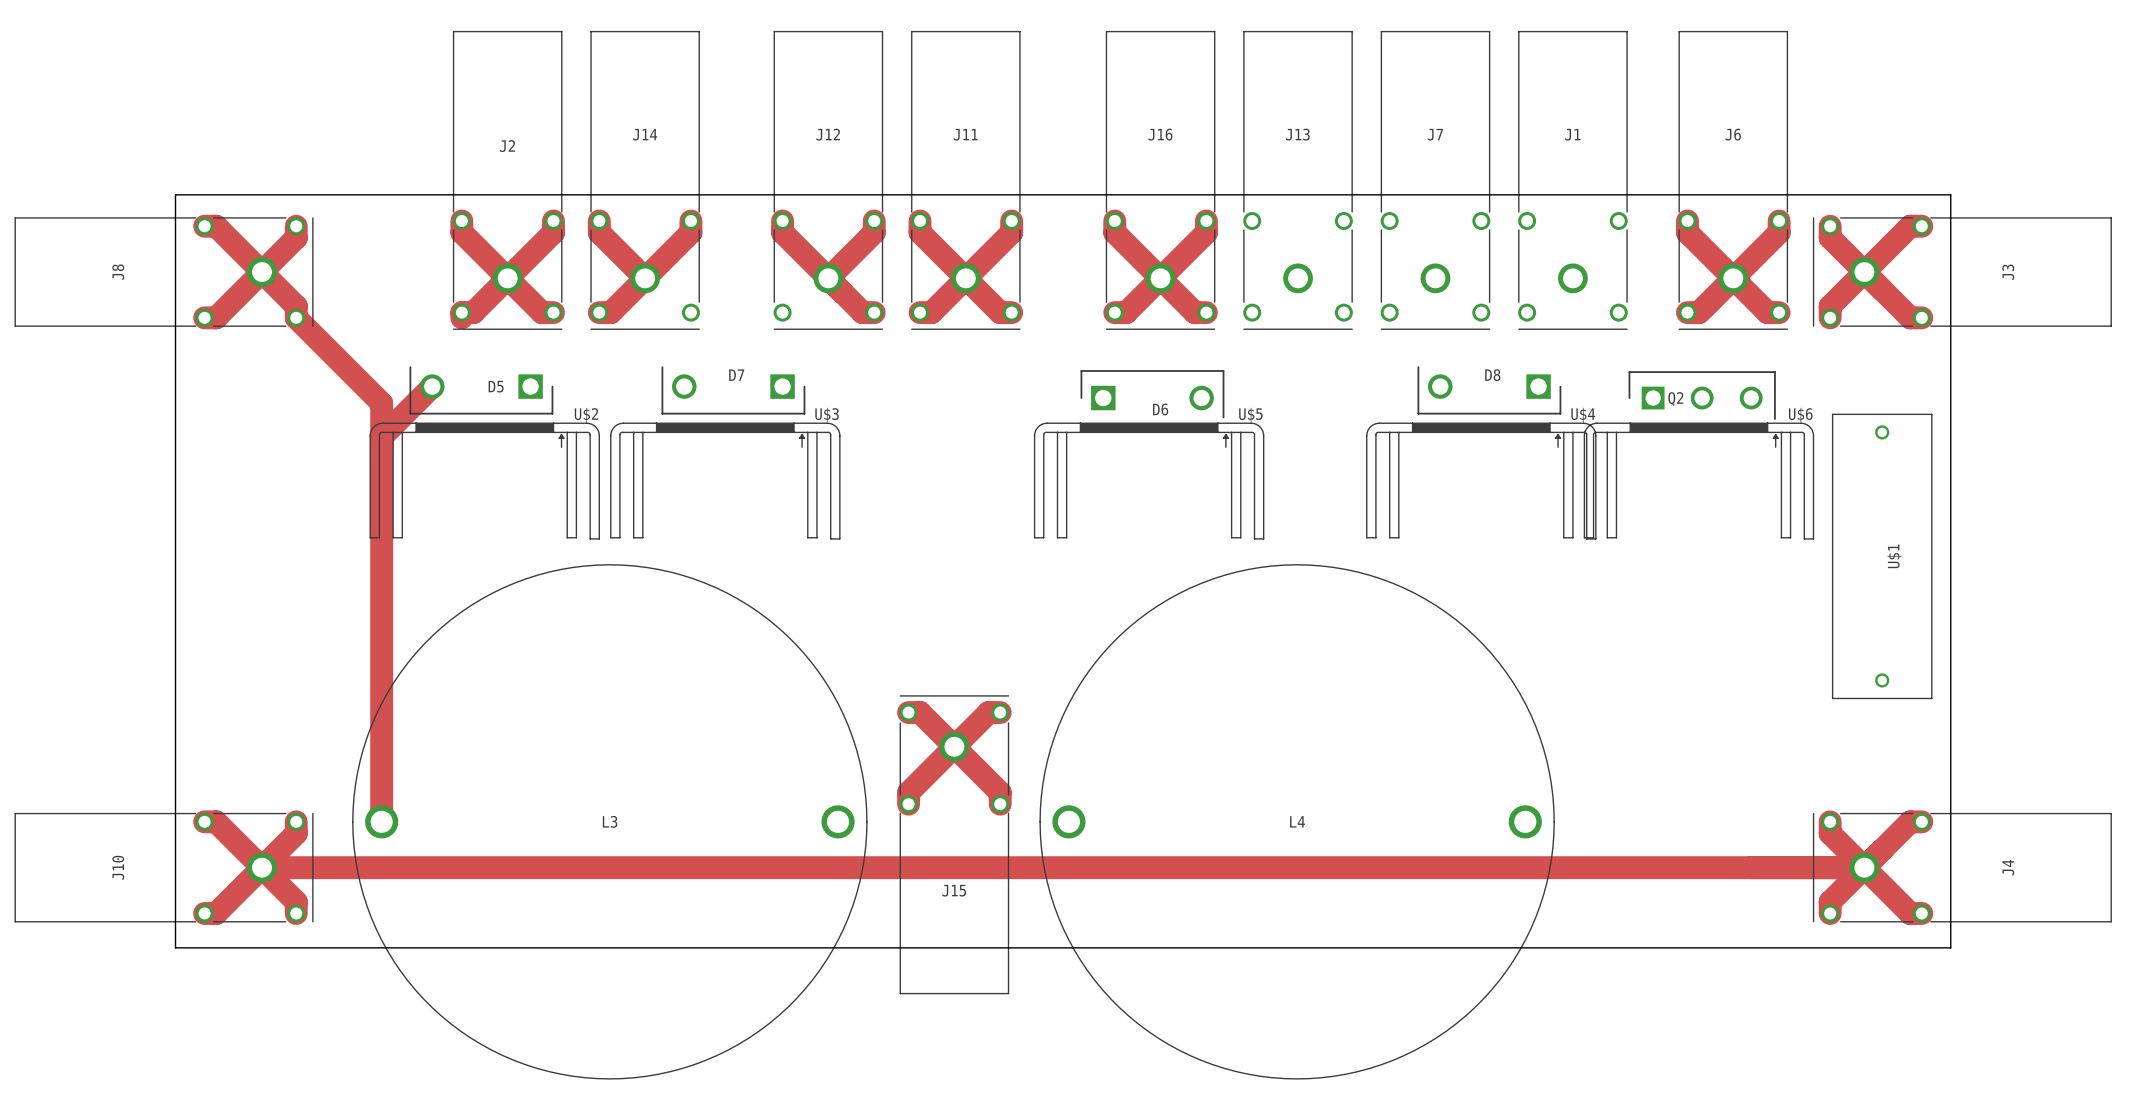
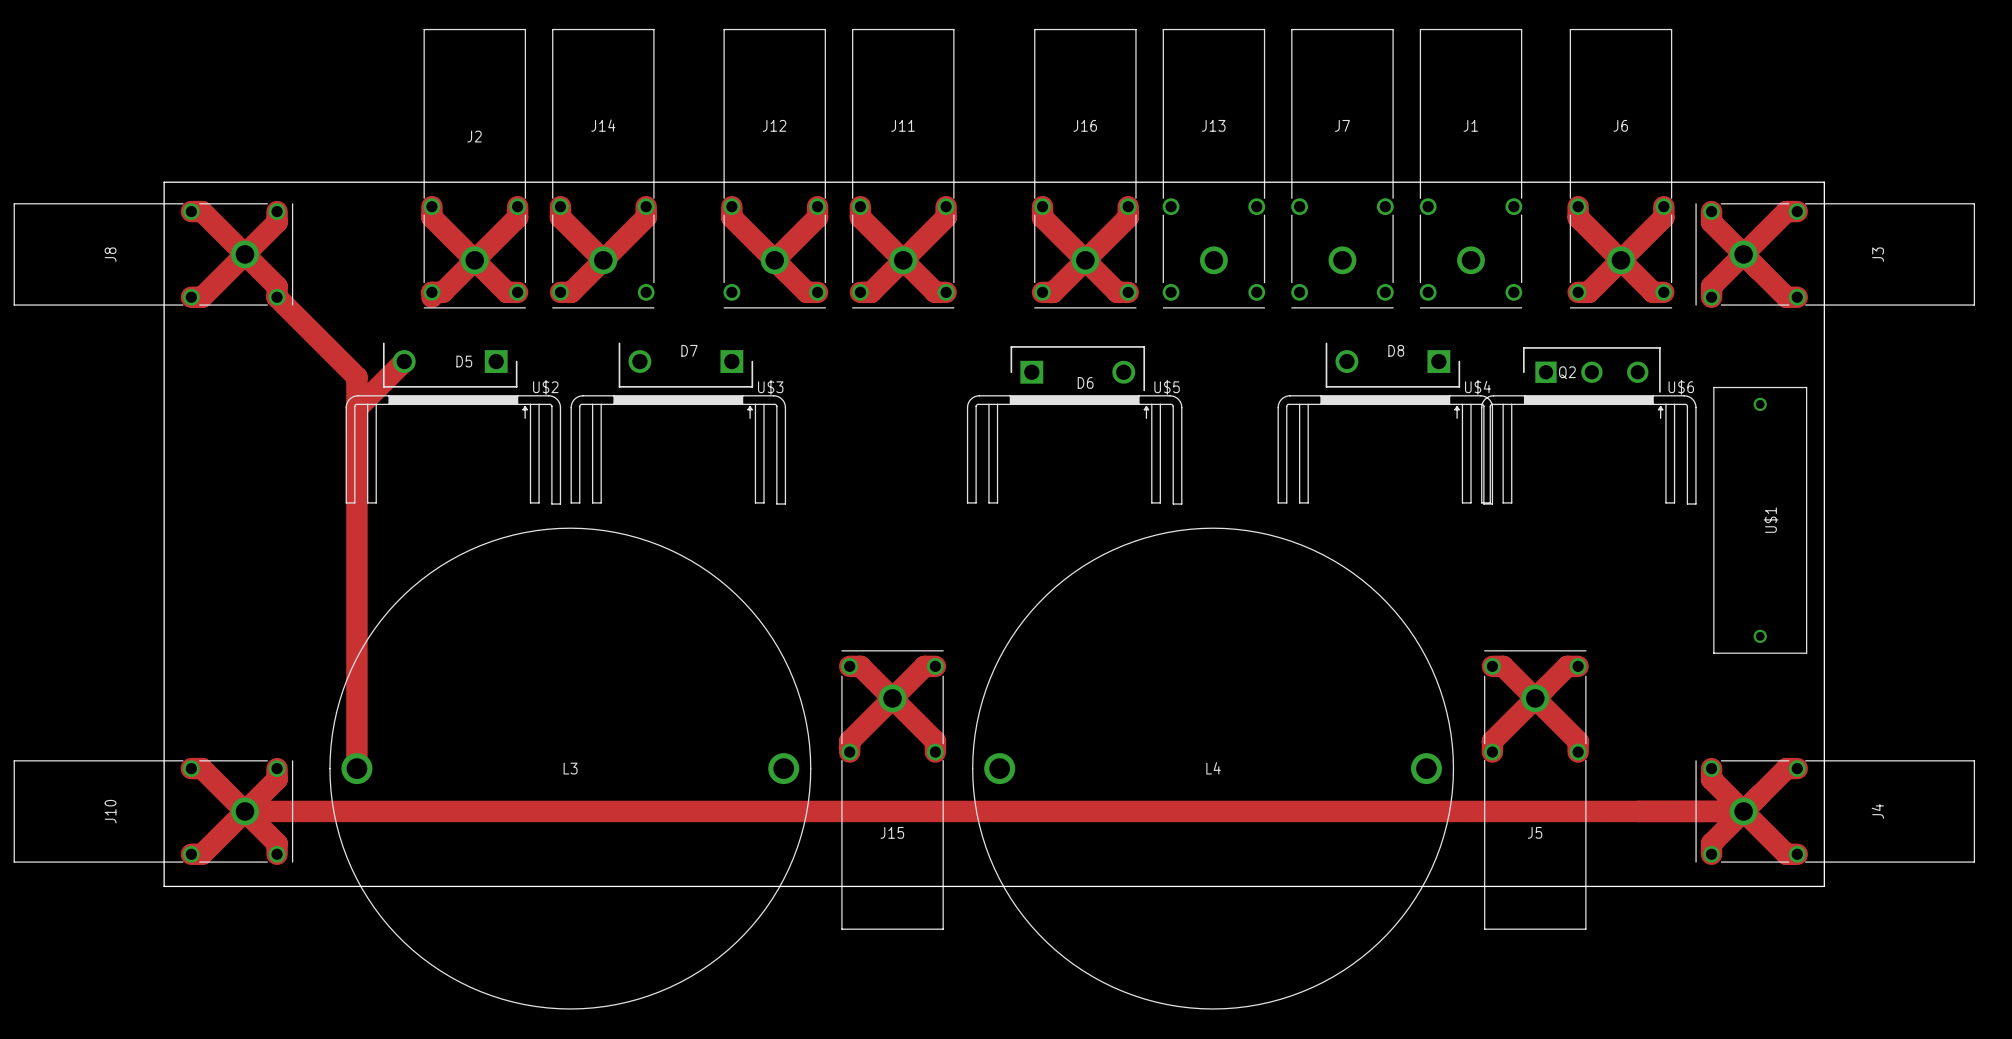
top track: none -> (1492, 666) (1503, 666) (1578, 741) (1578, 752)
top track: none -> (1578, 666) (1567, 666) (1492, 741) (1492, 752)
J5: none -> (1535, 790)

